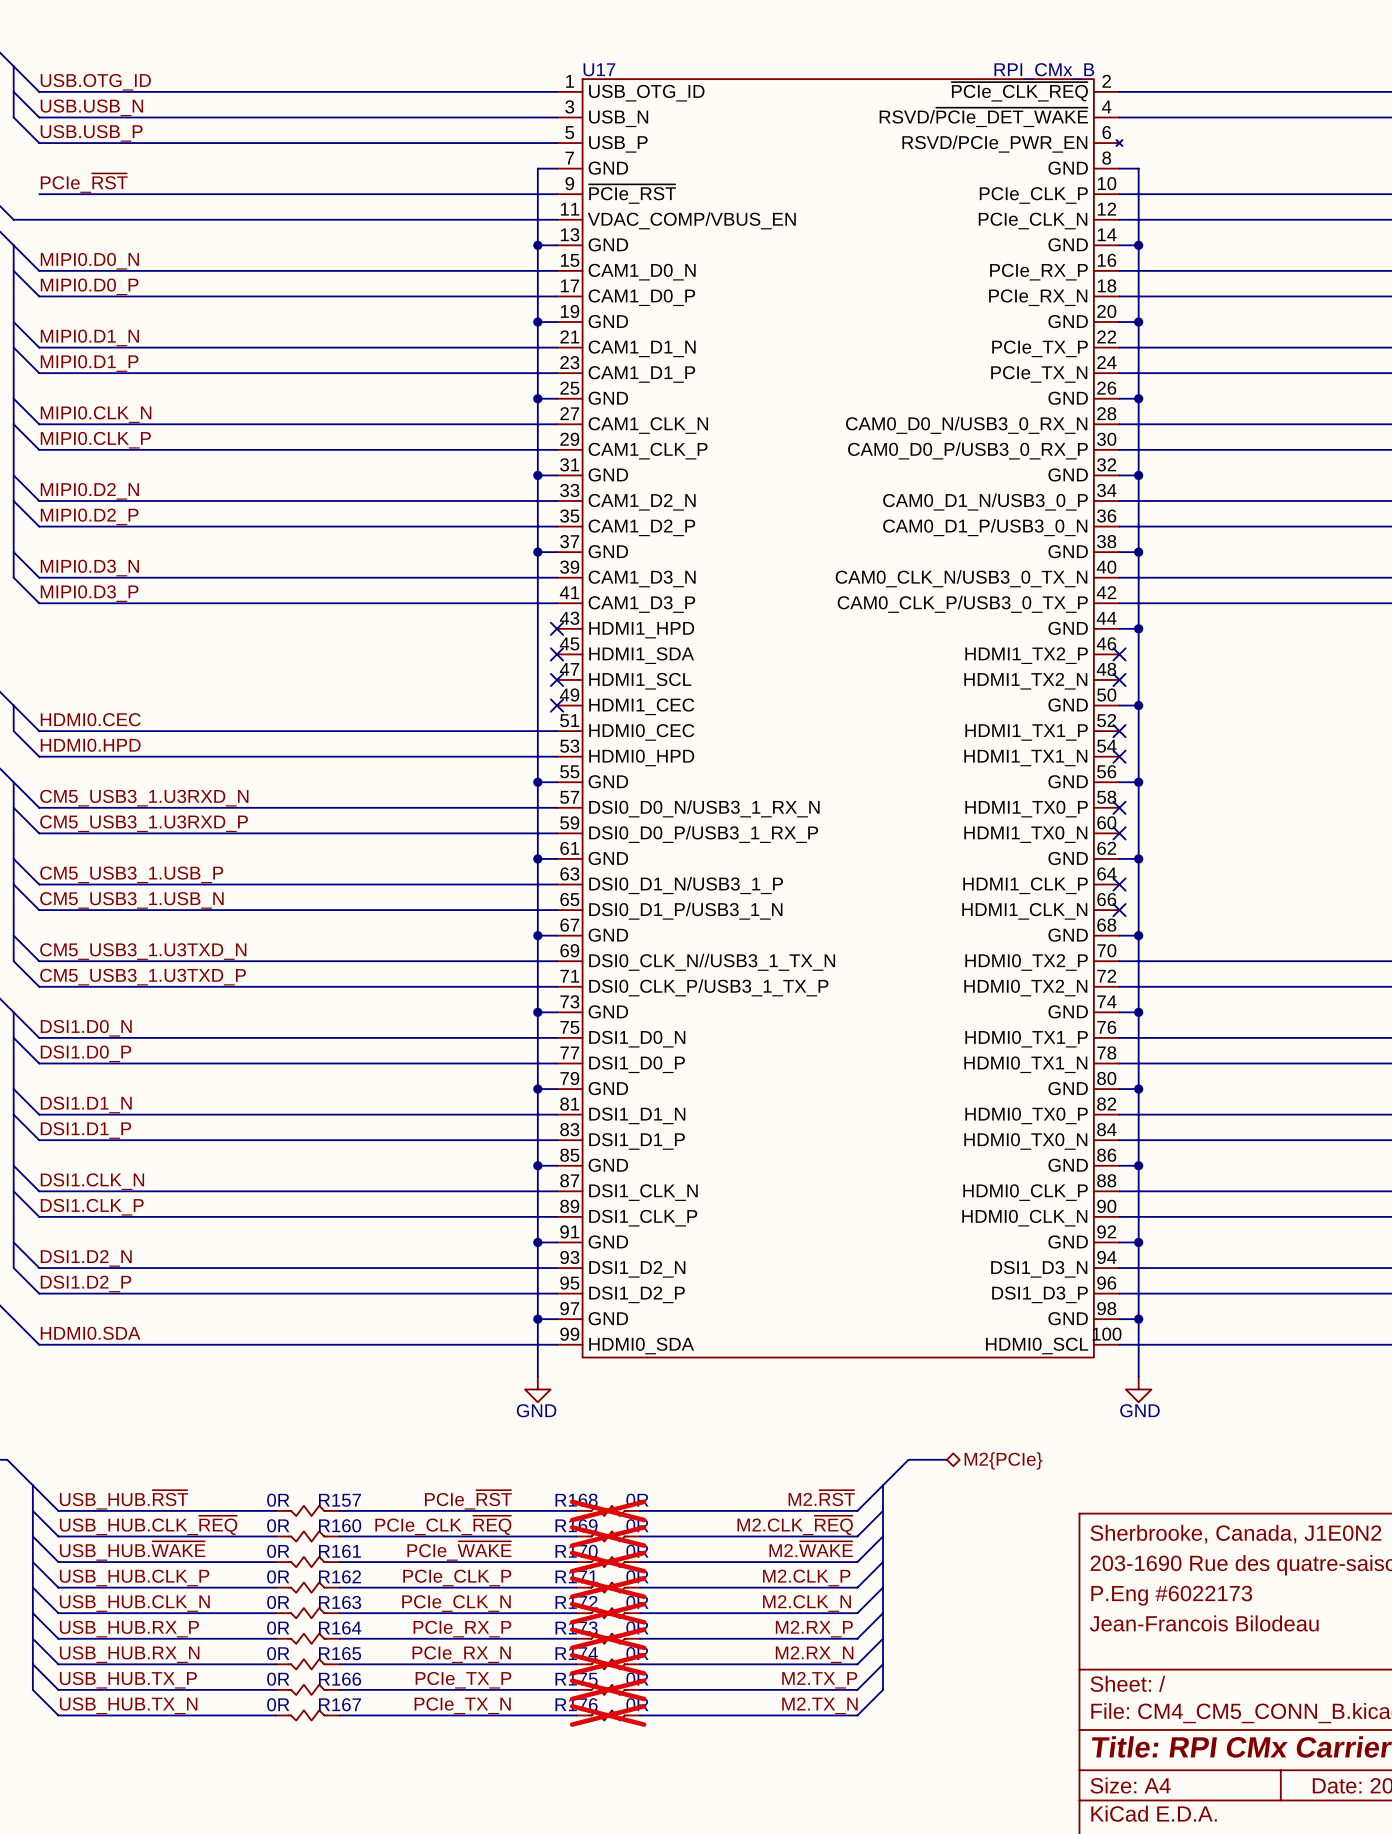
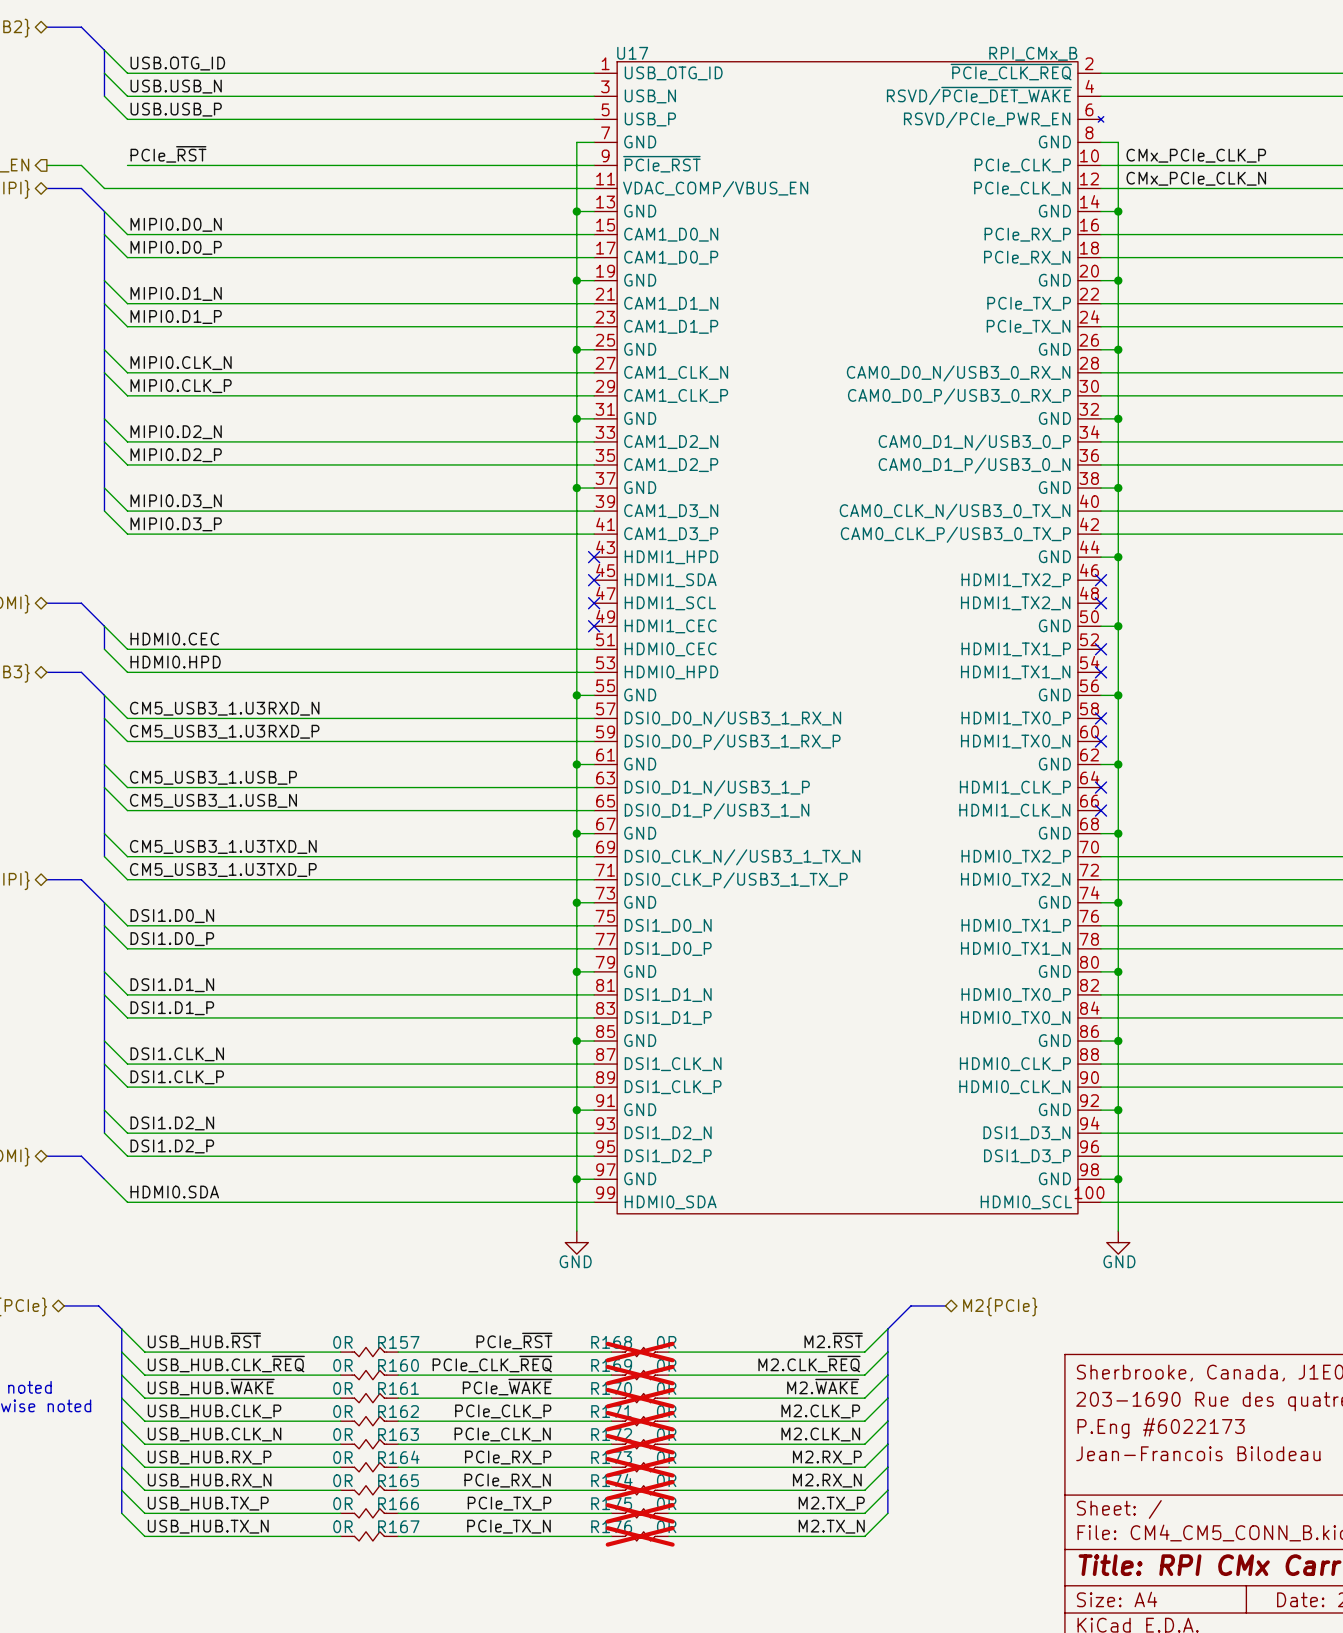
label: none -> CMx_PCIe_CLK_P (1196, 155)
label: none -> CMx_PCIe_CLK_N (1196, 178)

